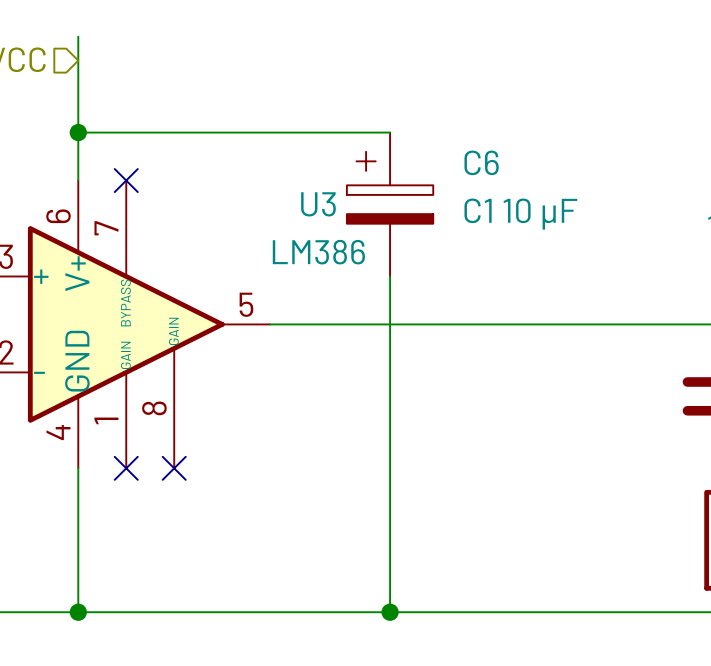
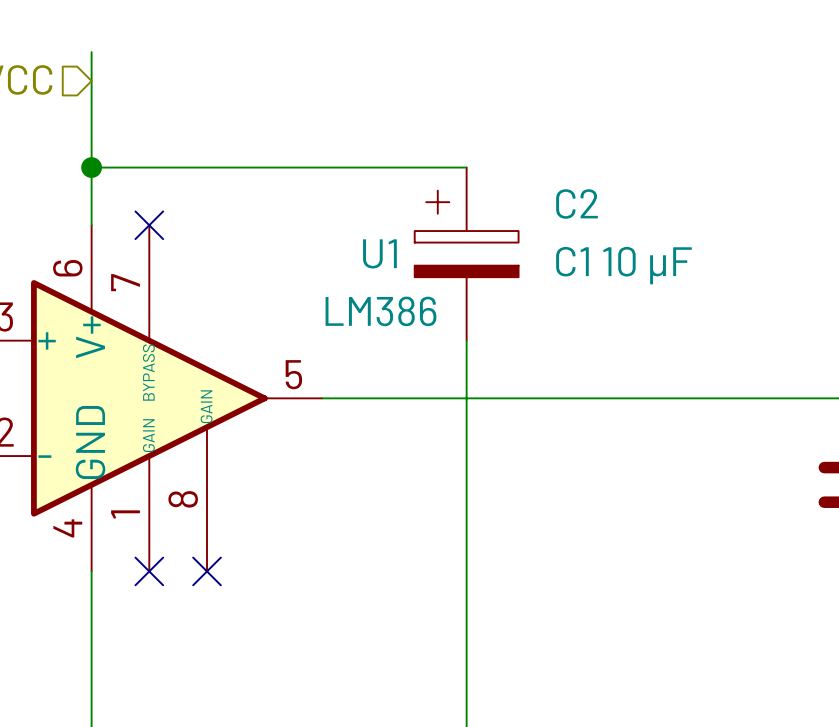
C6 name: C6 (481, 162) -> C2 (577, 204)
U3 name: U3 (318, 204) -> U1 (379, 253)

